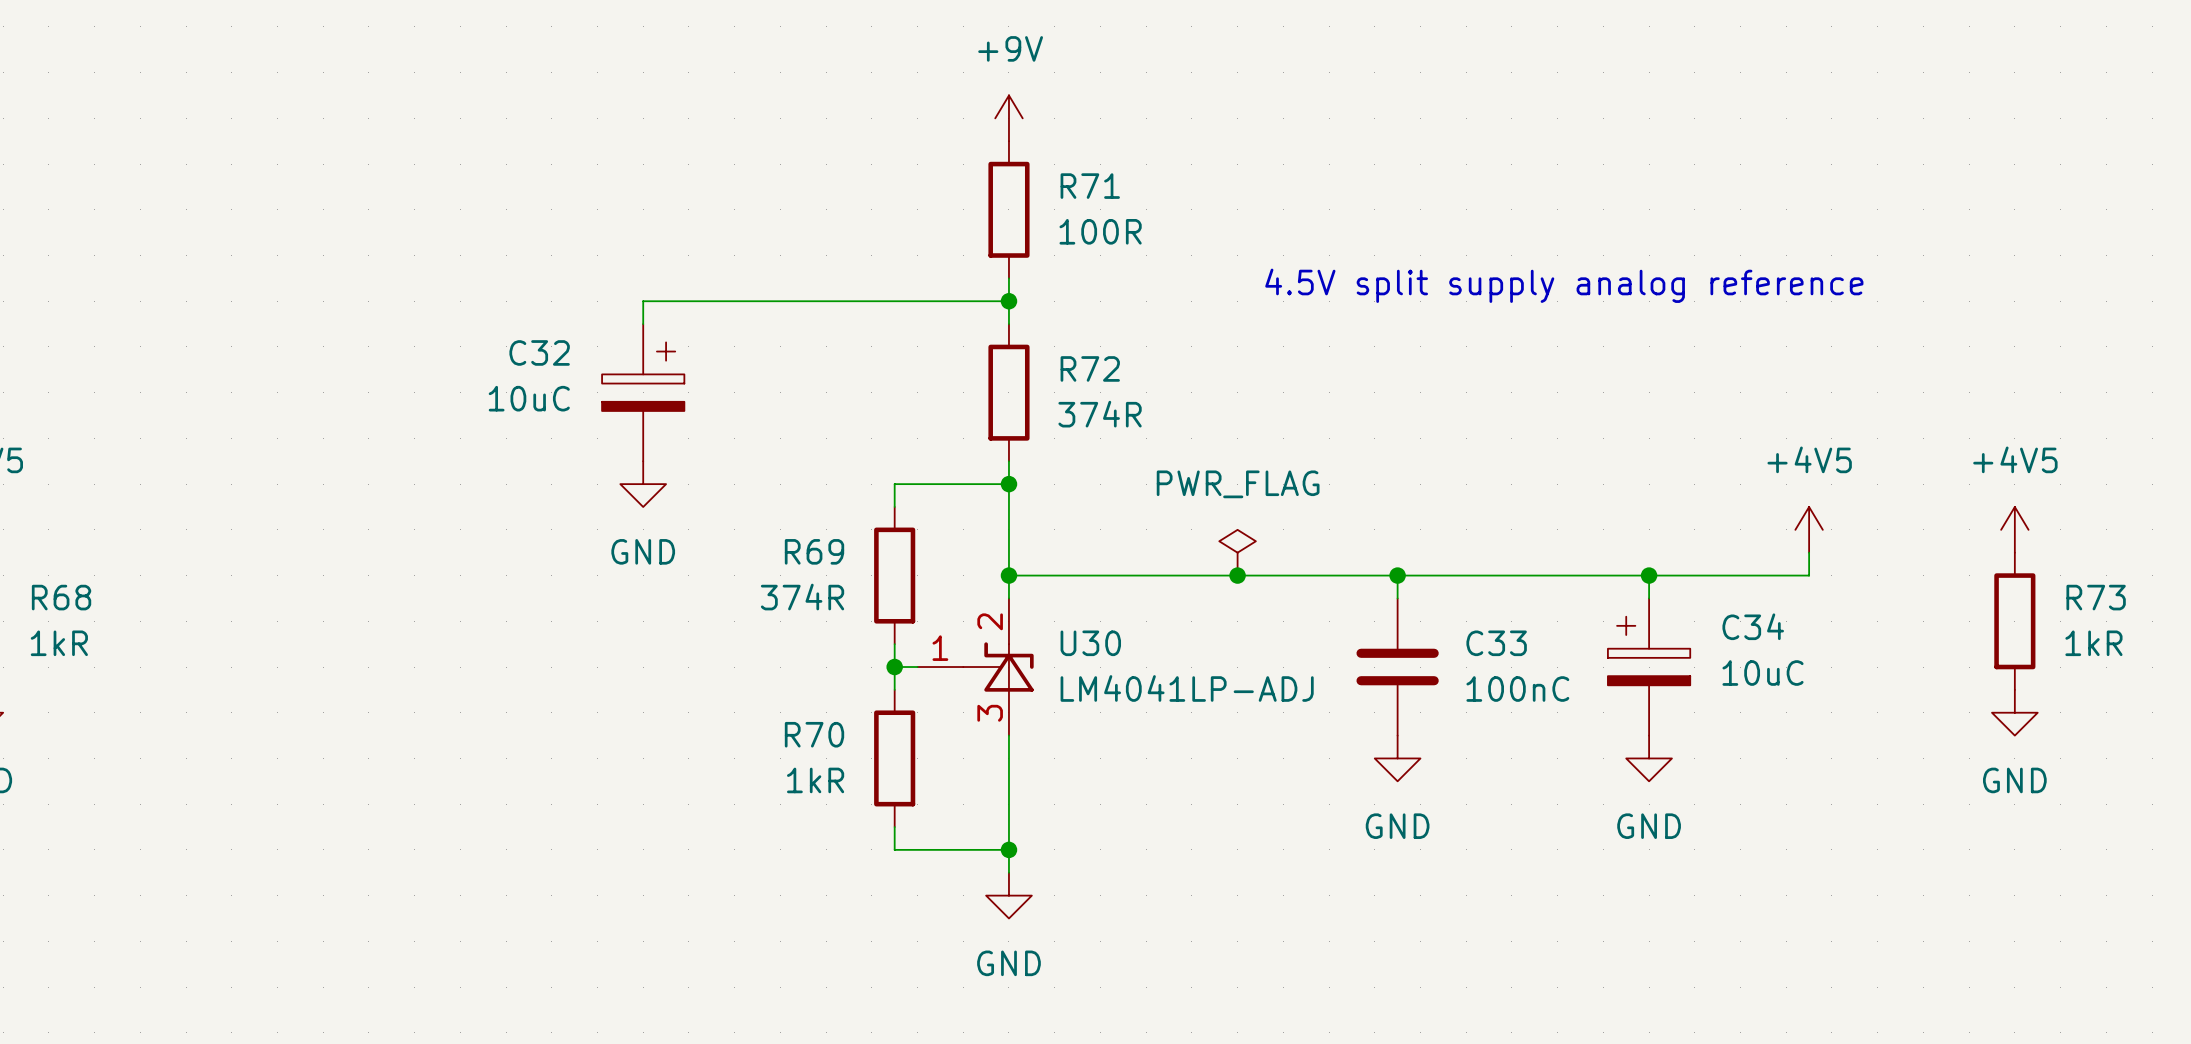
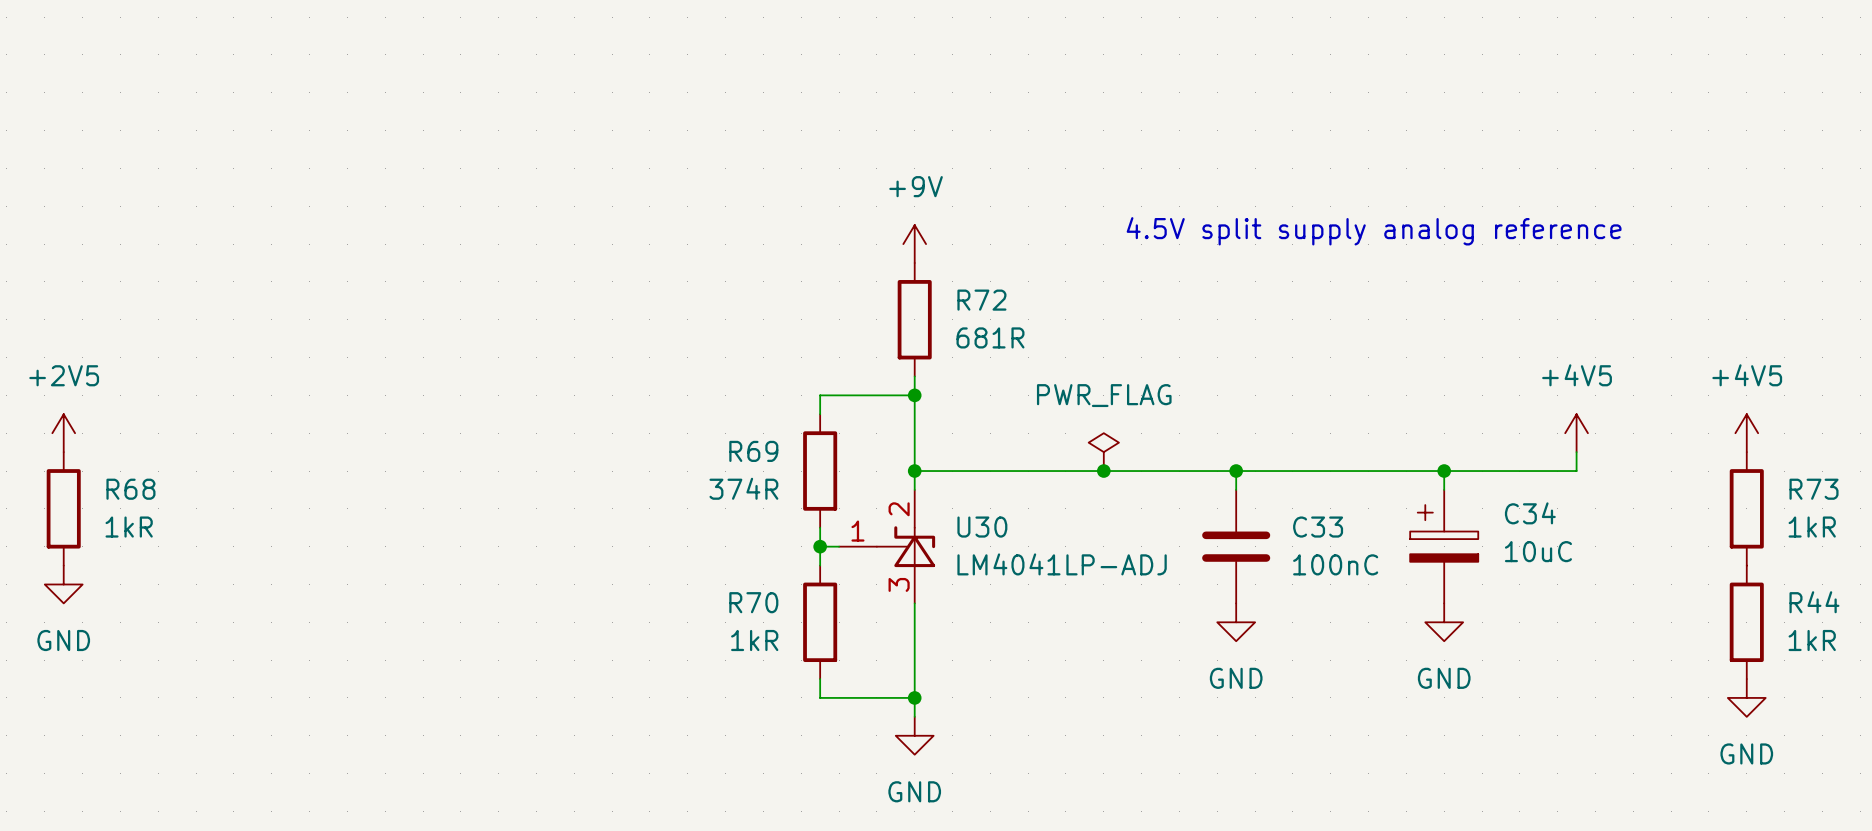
power symbol position: +9V (1008, 118) -> +9V (914, 244)
R71: 100R (1008, 209) -> none
wire: (1008, 301) (643, 301) (643, 324) -> none
junction: (1008, 301) -> none
C32: 10uC (643, 392) -> none
R72 value: 374R (1100, 414) -> 681R (990, 337)
power symbol: GND (643, 484) -> none
power symbol position: GND (2014, 712) -> GND (1746, 697)
R44: none -> 1kR (1746, 622)

